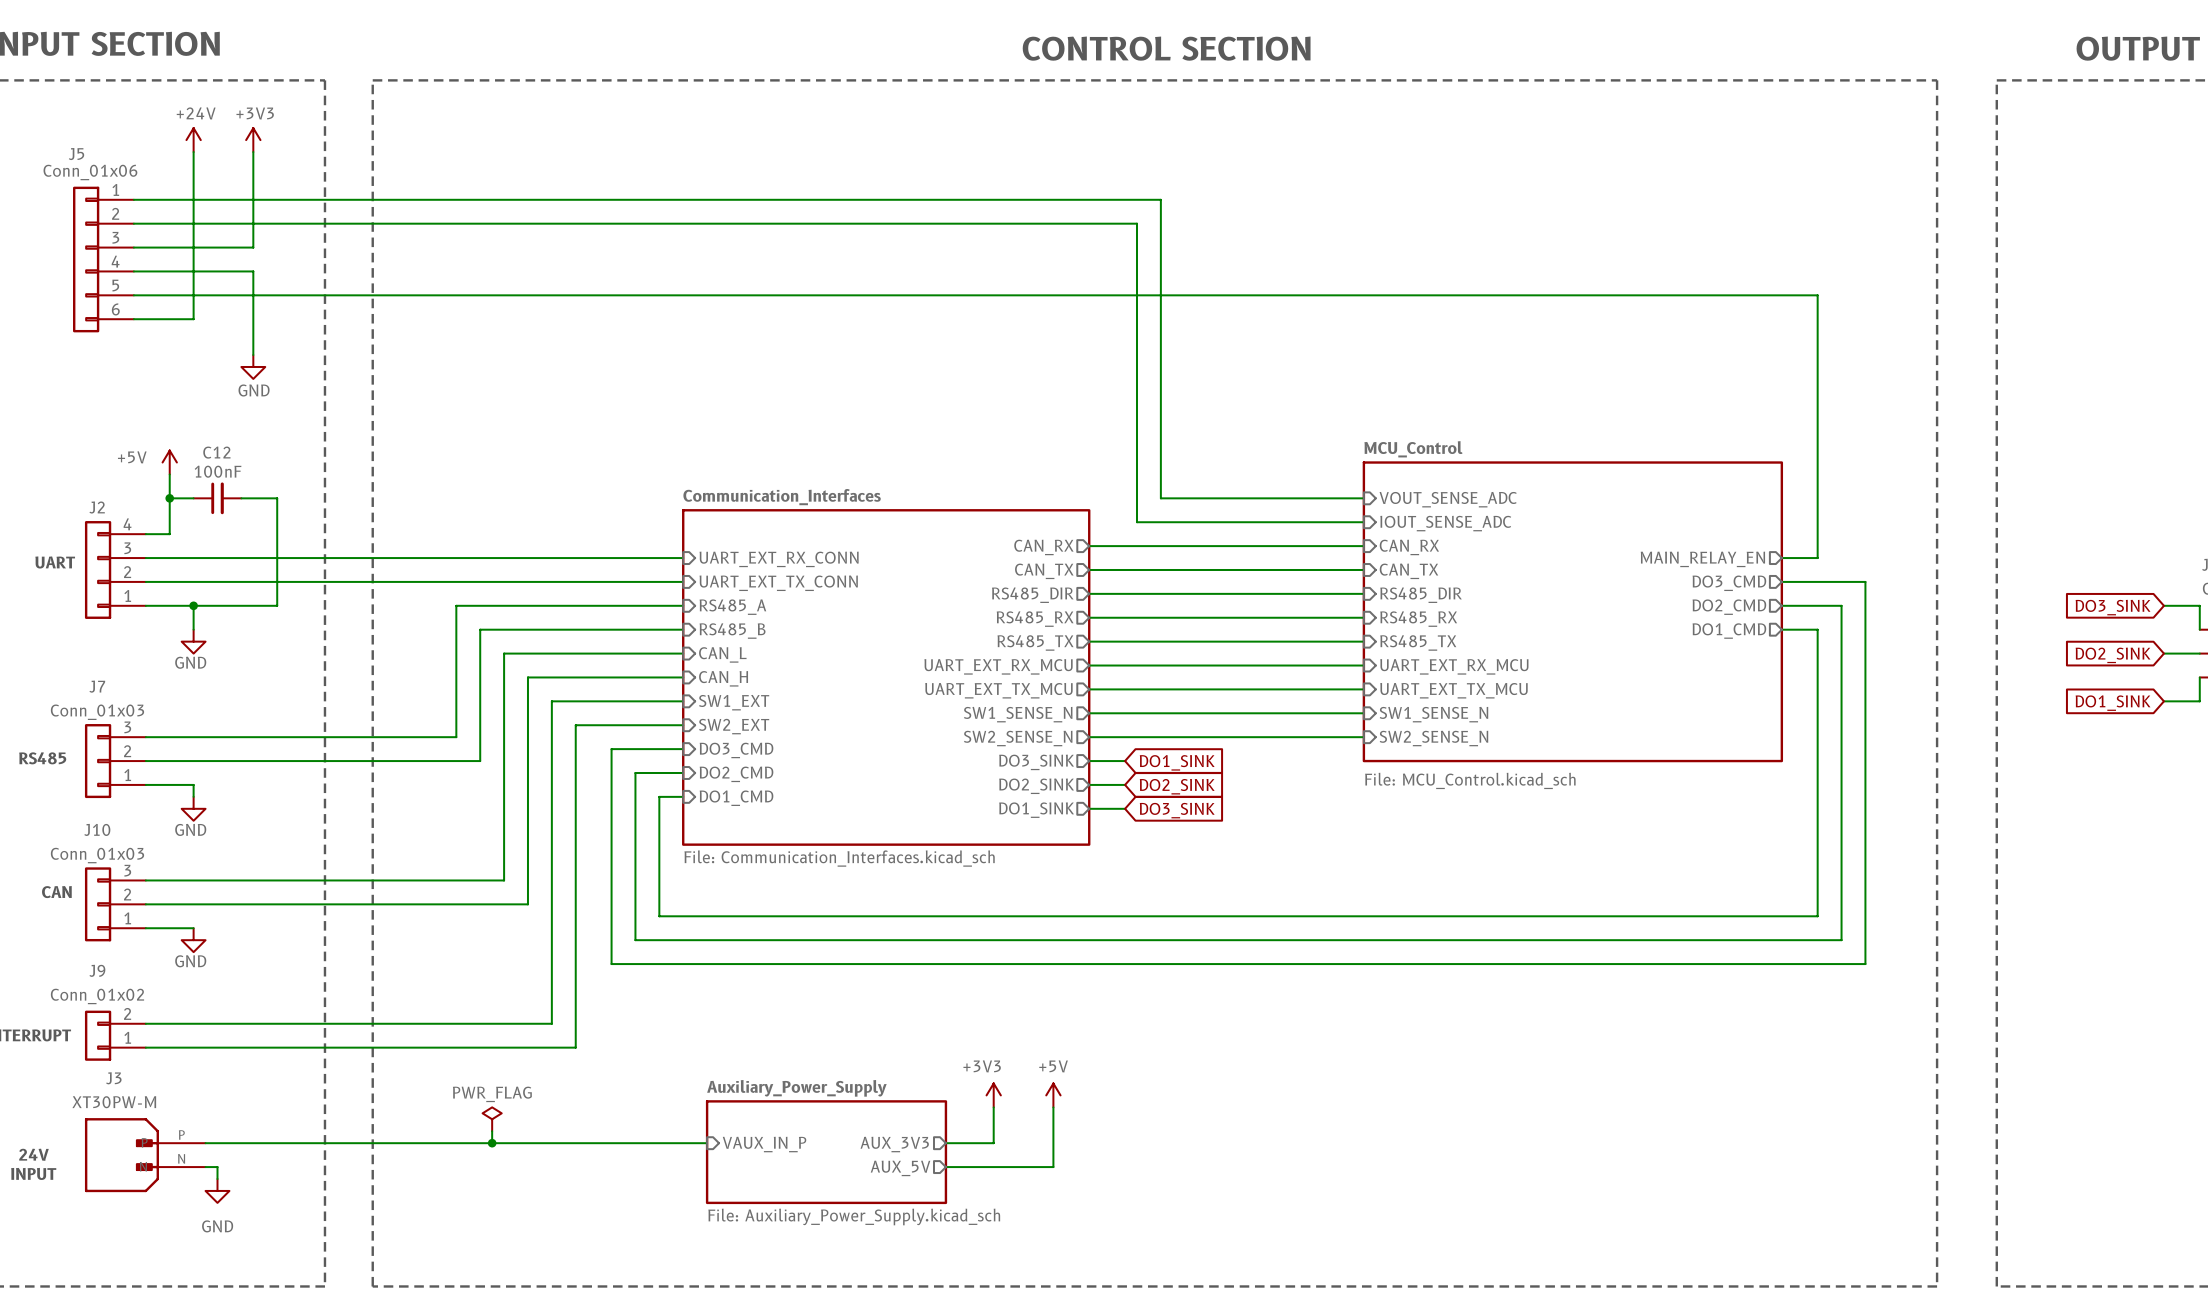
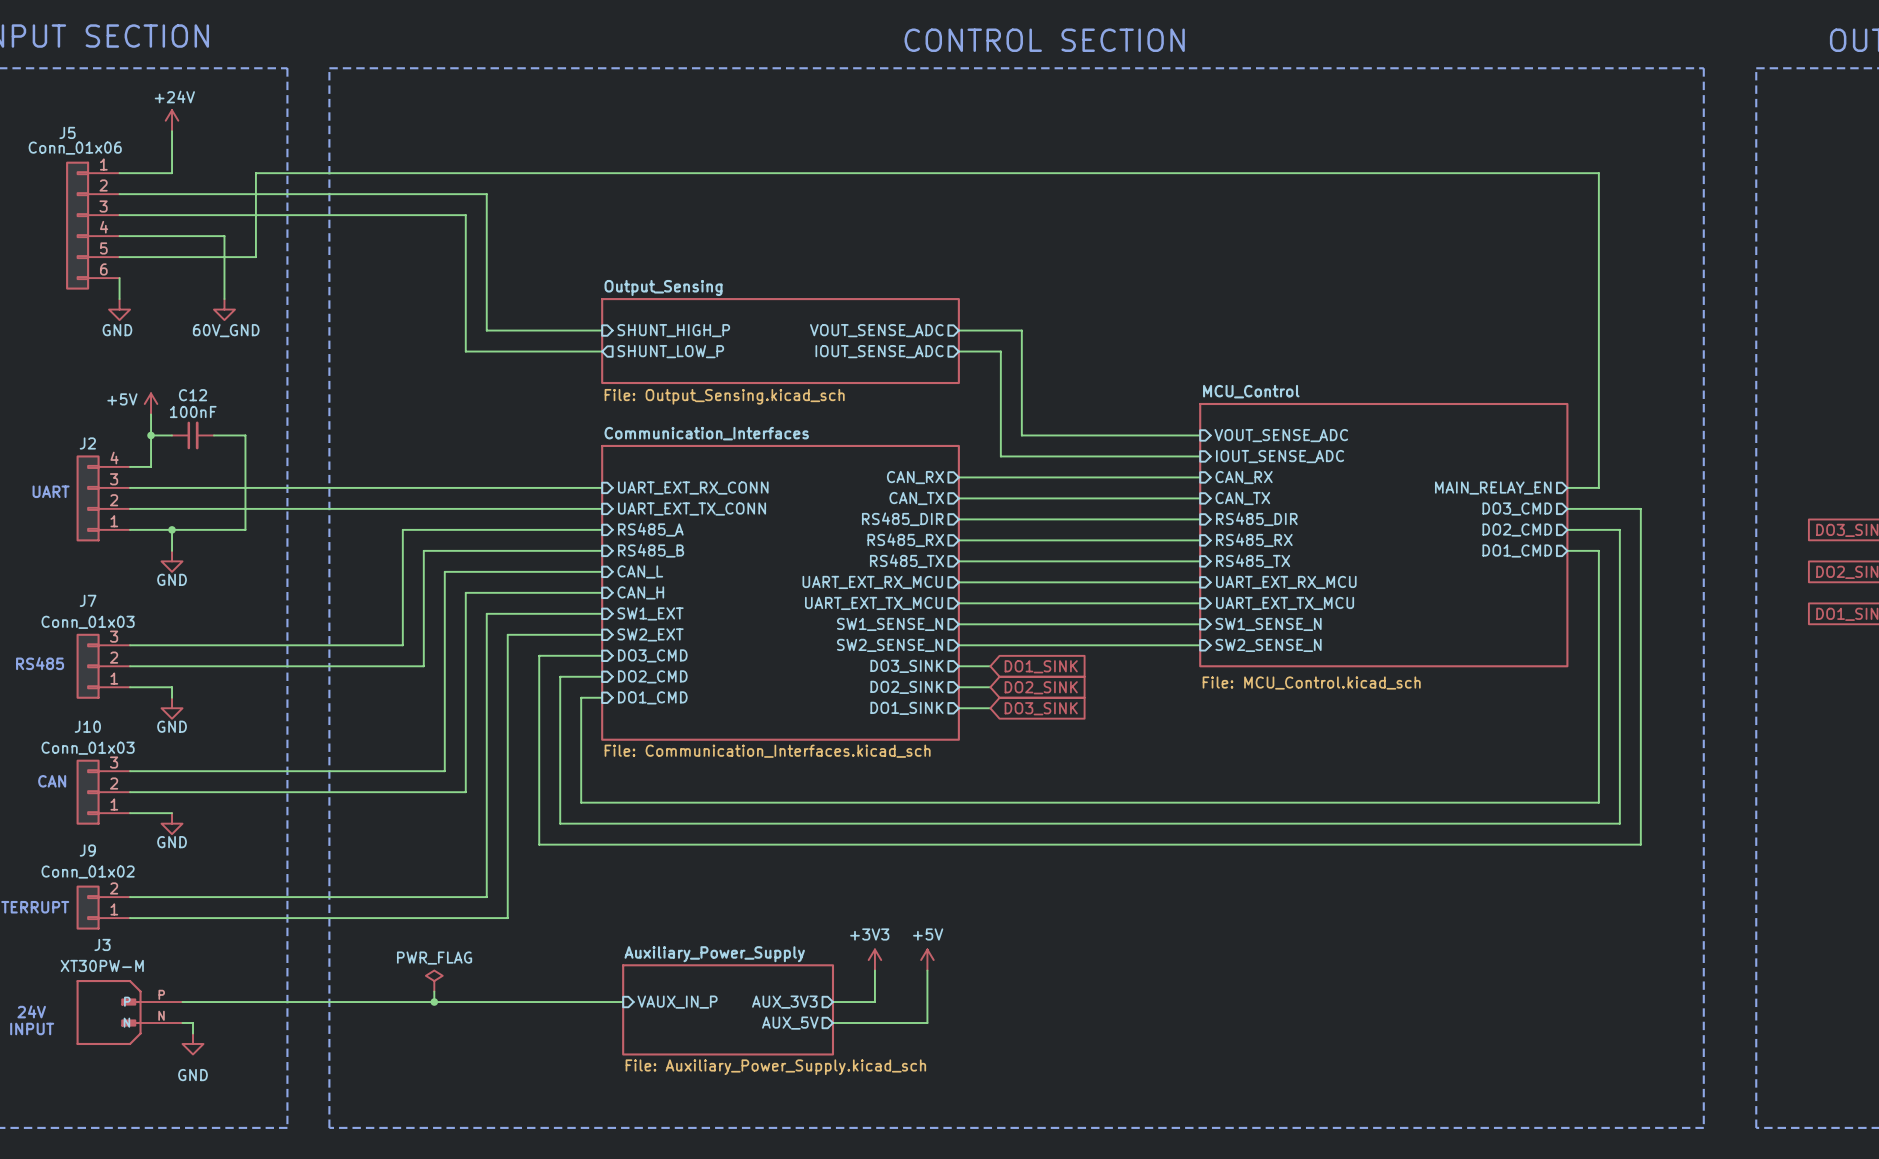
power symbol: +3V3 (253, 140) -> none
wire: (253, 152) (253, 247) -> (602, 351) (465, 351) (465, 215) (224, 215)
wire: (289, 199) (193, 199) (193, 319) (133, 319) -> (255, 173) (255, 257)
wire: (1160, 199) (1160, 378) -> (958, 330) (1021, 330)
wire: (551, 223) (1136, 223) (1136, 402) -> (486, 194) (486, 330) (602, 330)
wire: (289, 295) (1817, 295) -> (1021, 173) (1598, 173) (1598, 257)
wire: none -> (119, 278) (119, 299)
power symbol: none -> 60V_GND (224, 309)
power symbol position: GND (253, 366) -> GND (119, 309)
sheet pin: none -> SHUNT_HIGH_P (673, 330)
sheet pin: none -> VOUT_SENSE_ADC (876, 330)
sheet Output_Sensing: none -> File: Output_Sensing.kicad_sch (780, 341)
wire: none -> (958, 351) (1000, 351)
sheet pin: none -> SHUNT_LOW_P (670, 351)
sheet pin: none -> IOUT_SENSE_ADC (879, 351)

